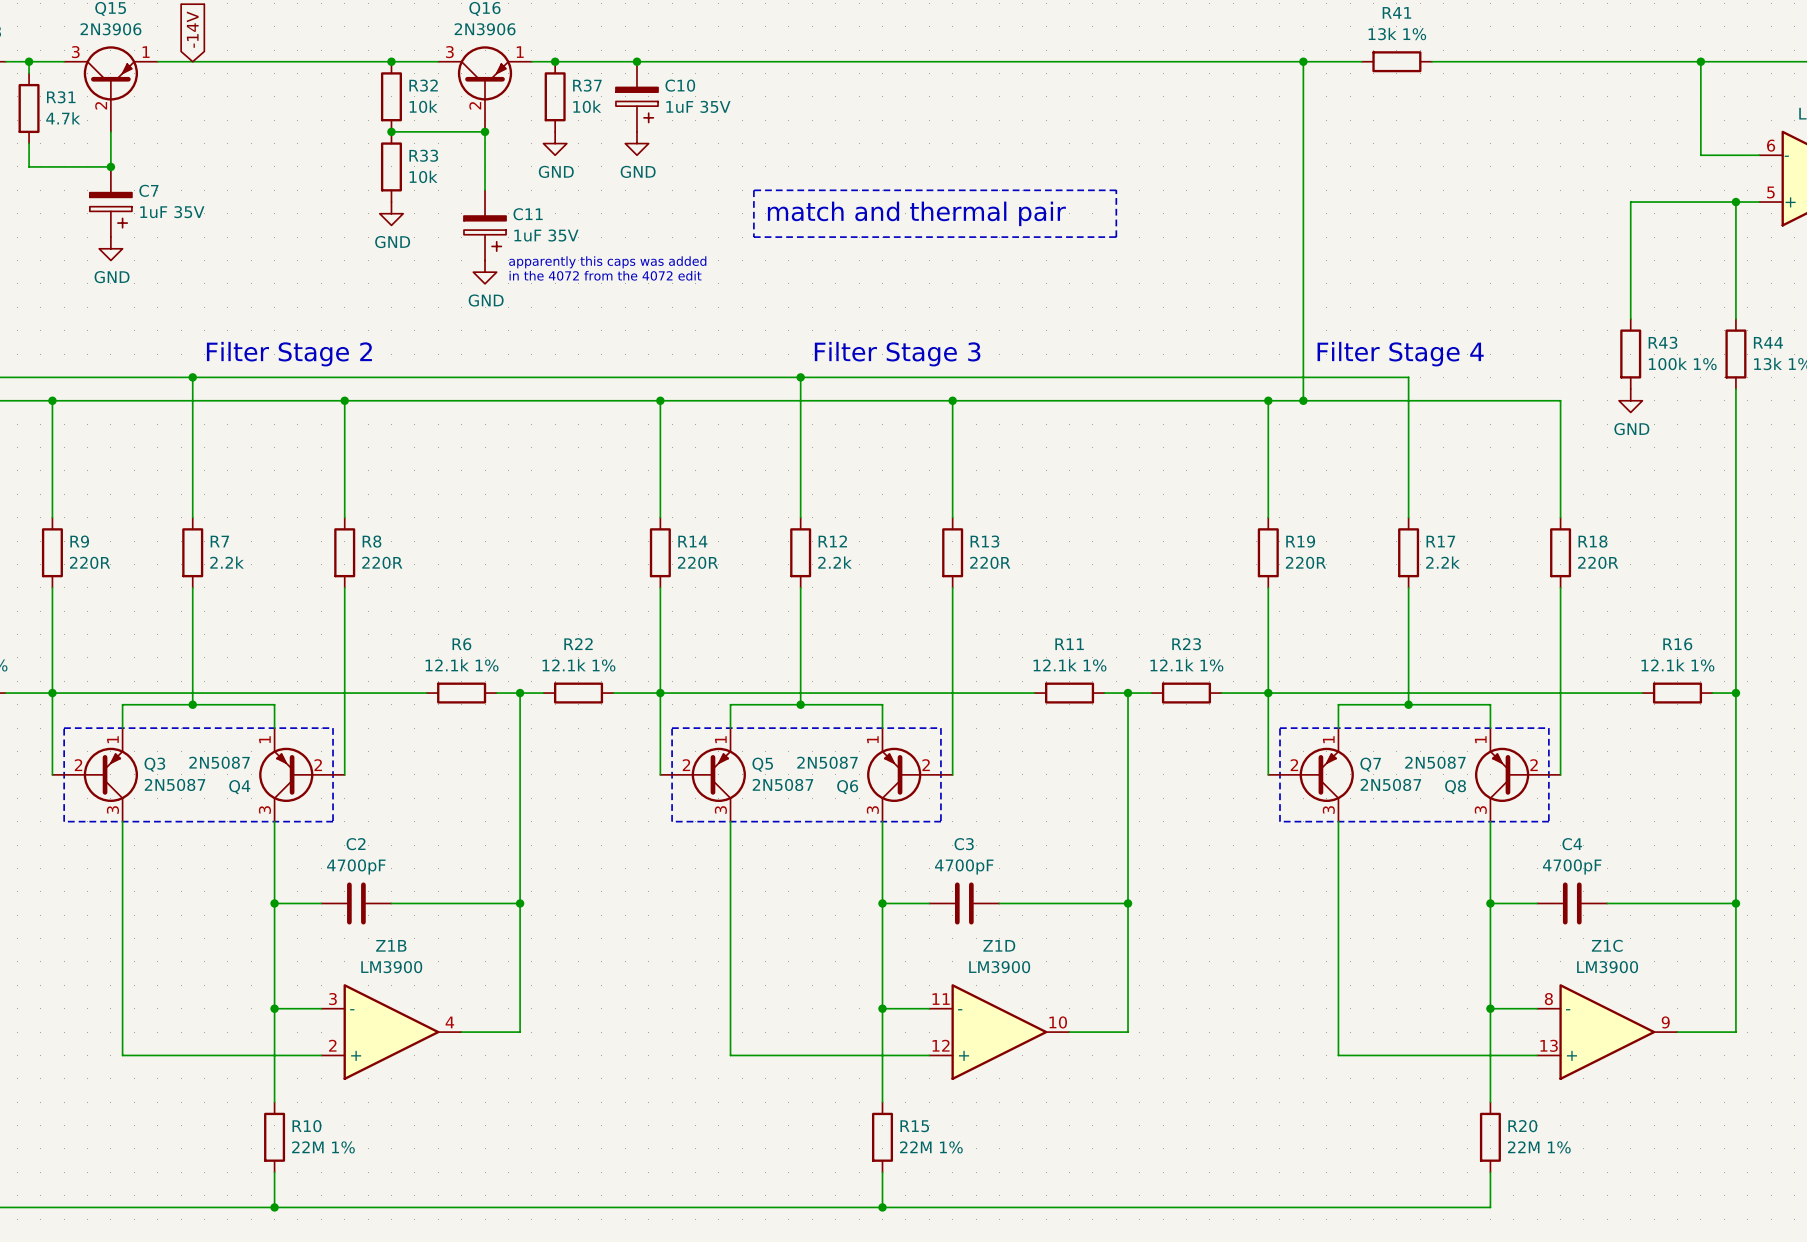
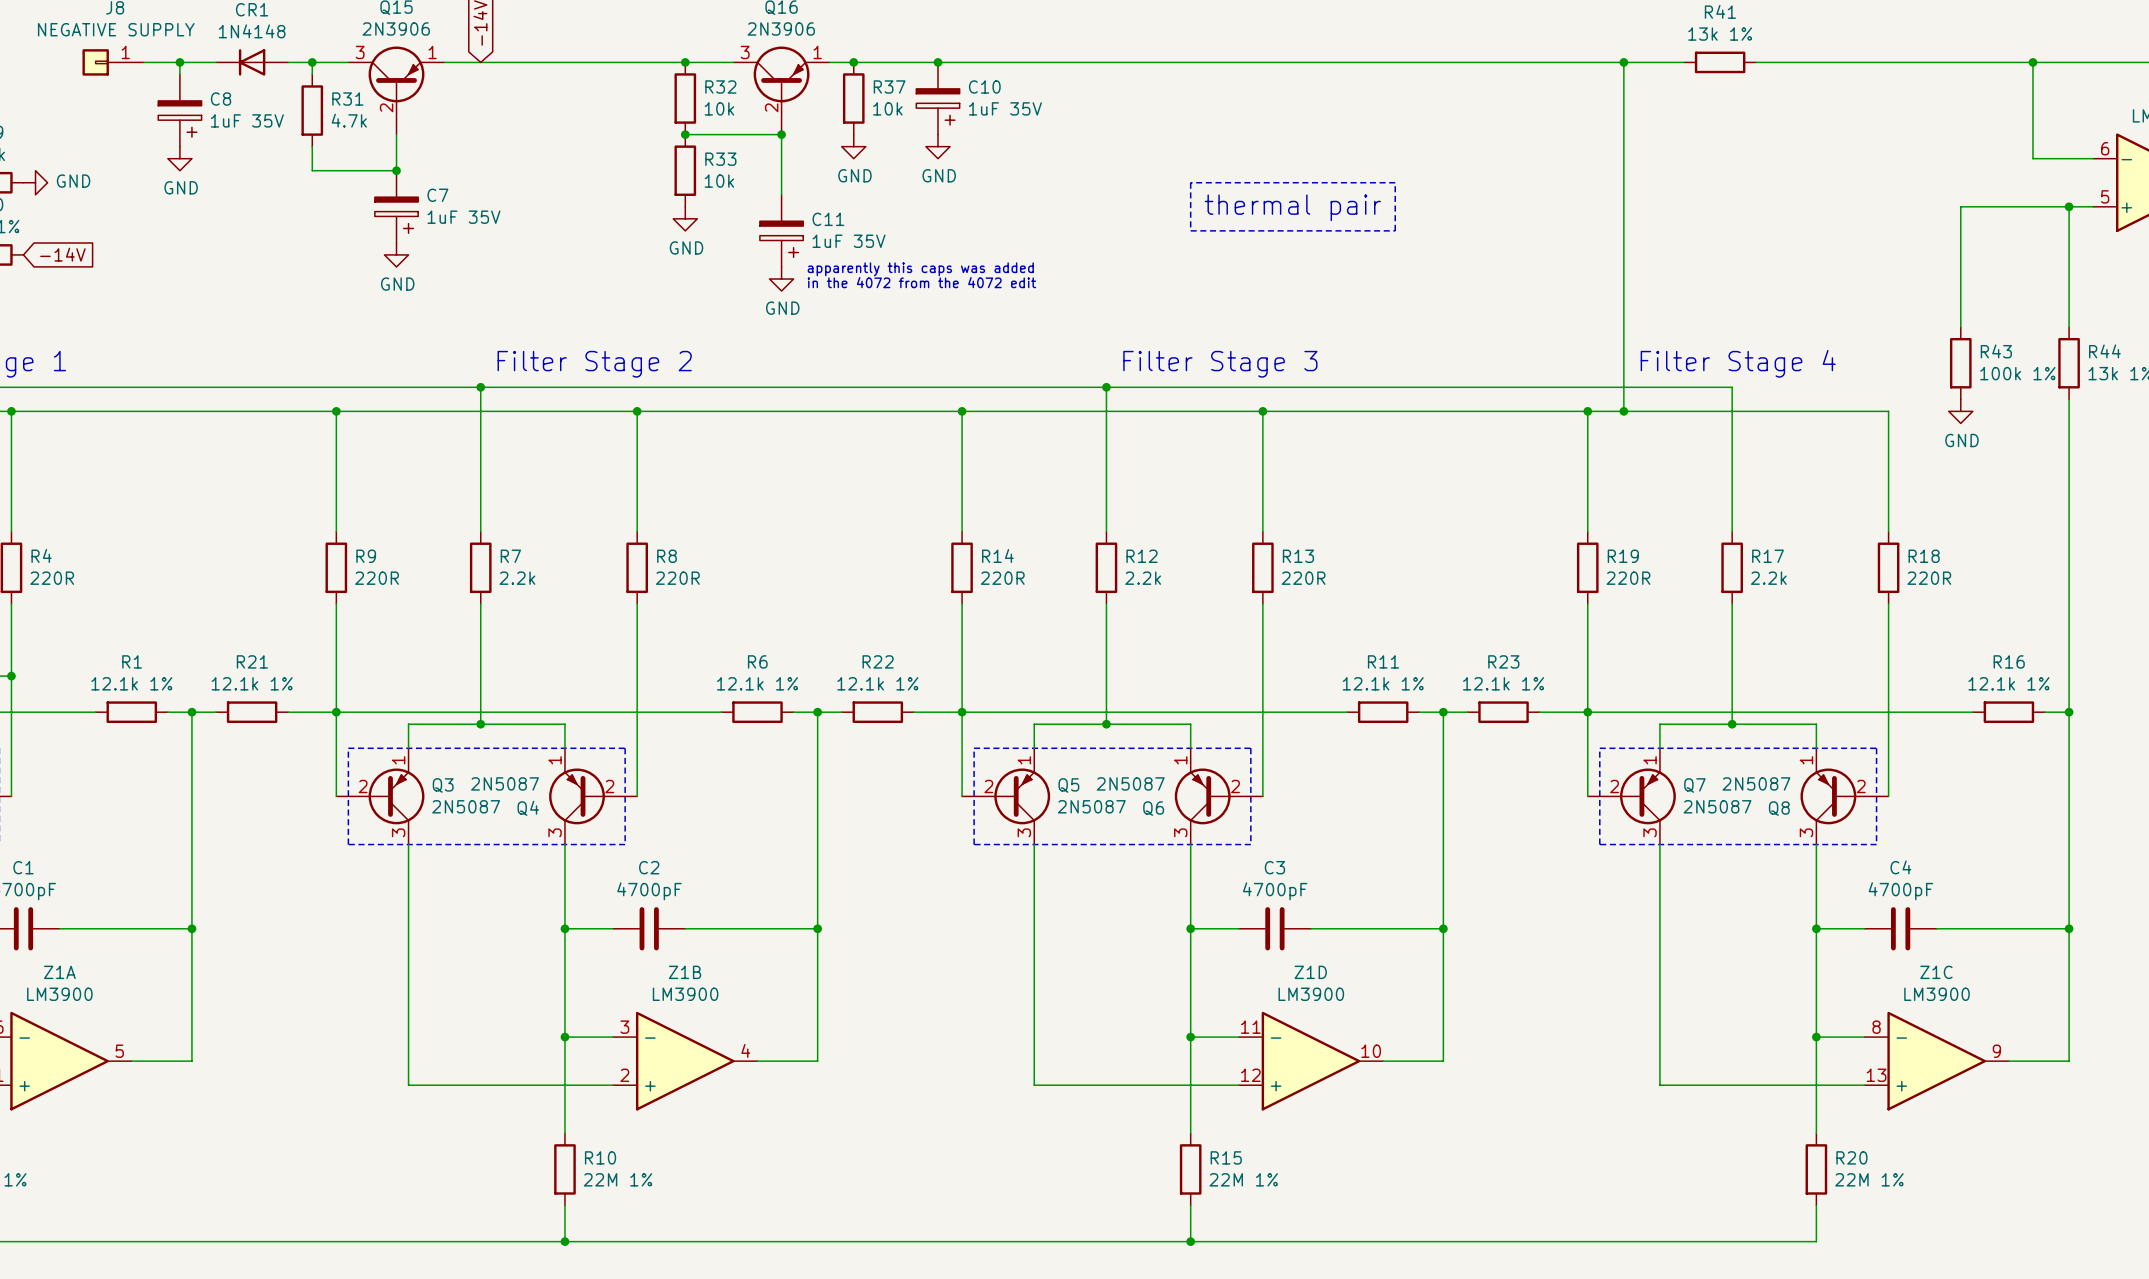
line: none -> (1190, 182) (1190, 230) (1395, 230) (1395, 182) (1190, 182)
line: (753, 190) (753, 237) (1116, 237) (1116, 190) (753, 190) -> none
text: match and thermal pair (916, 213) -> thermal pair (1292, 207)

